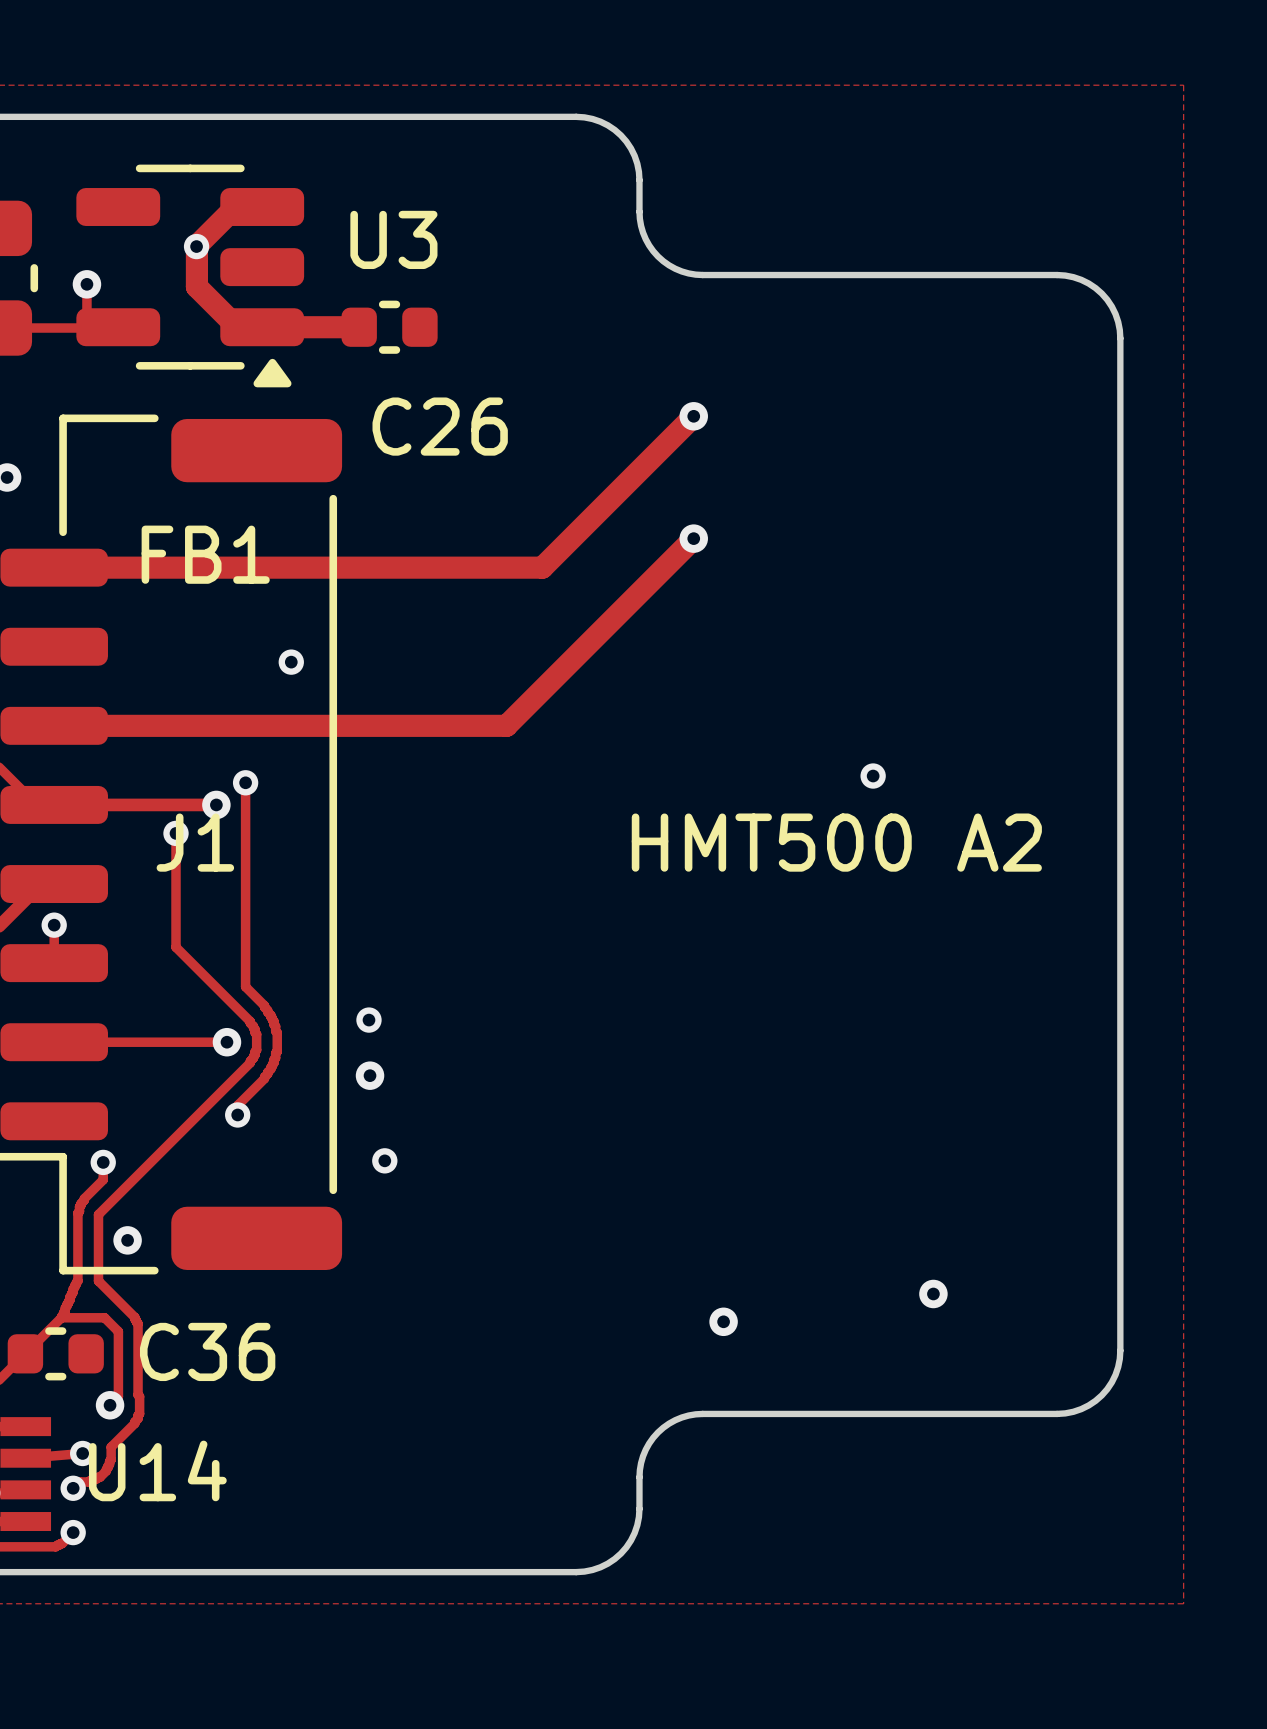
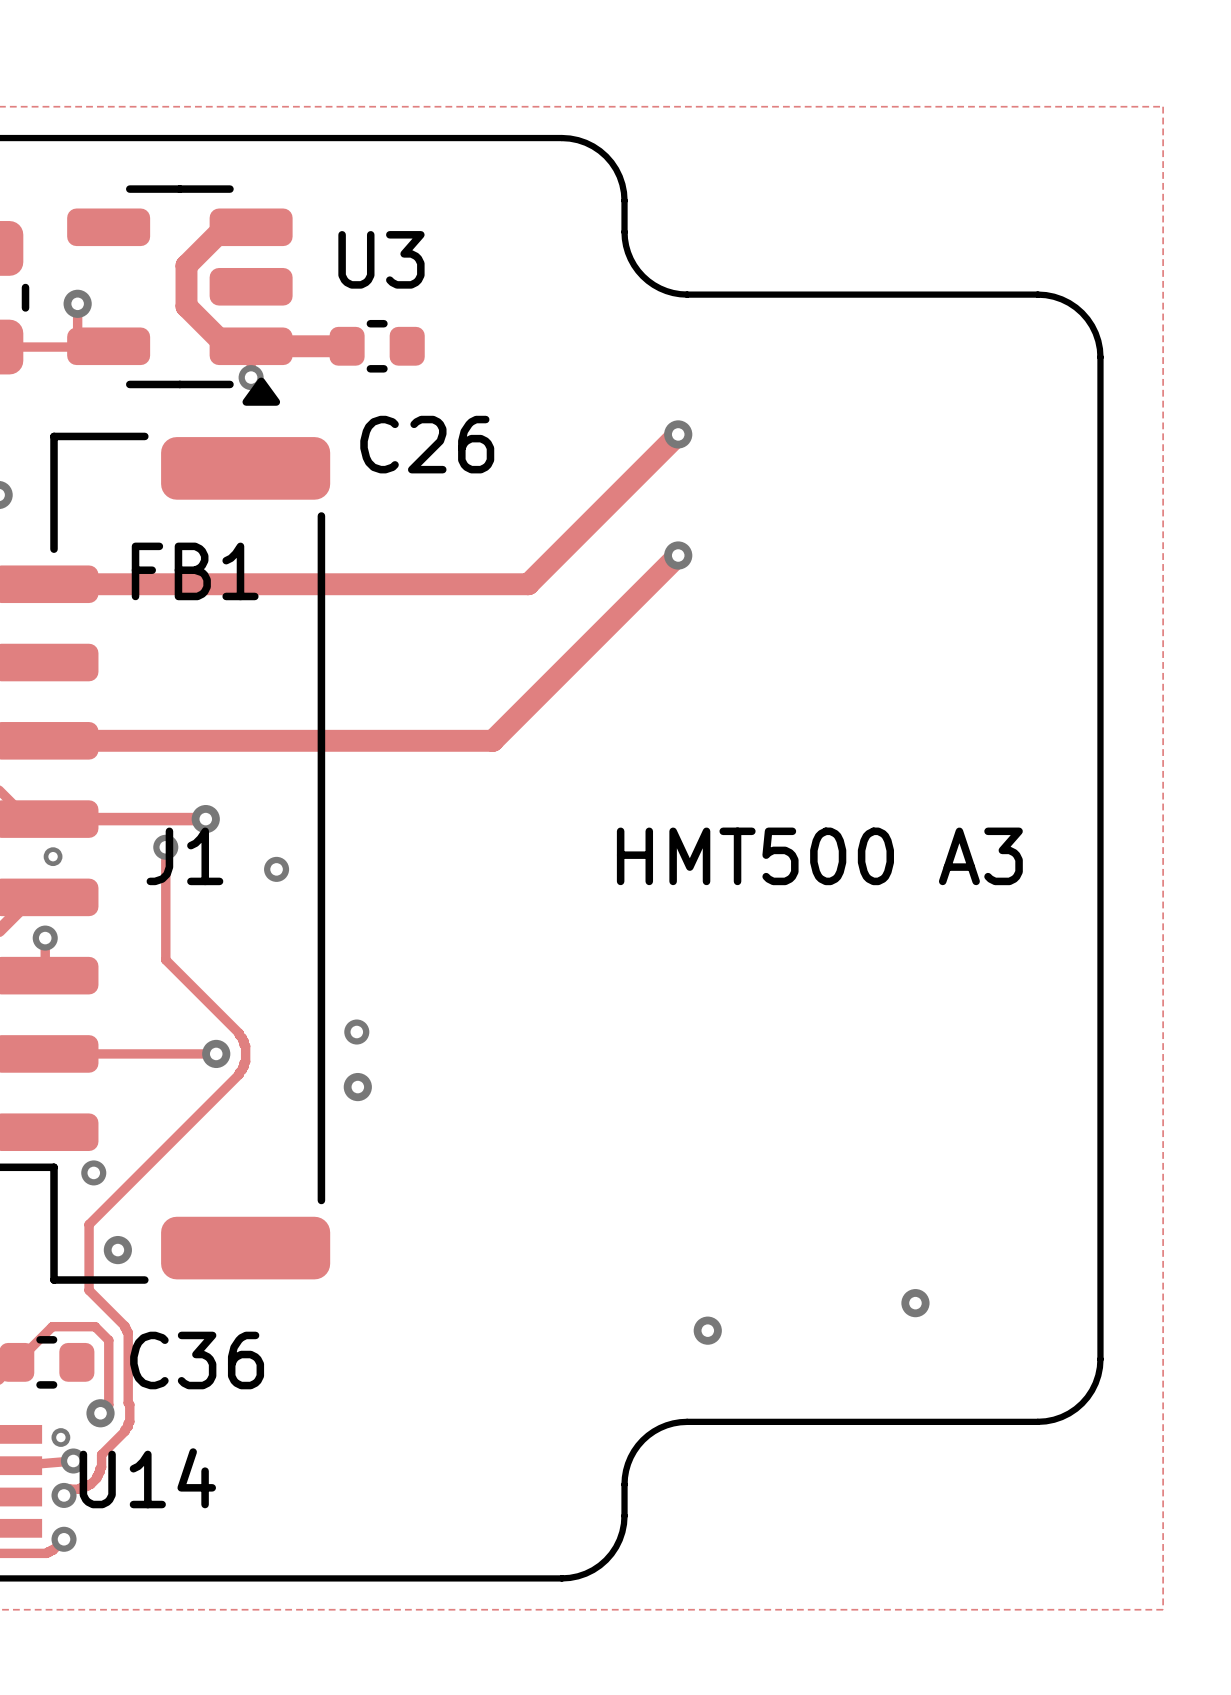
via position: (196, 246) -> (251, 377)
via: (291, 662) -> none
via: (873, 776) -> none
track: (245, 782) (245, 986) (264, 1005) (274, 1021) (277, 1032) (277, 1051) (274, 1062) (264, 1078) (237, 1105) (237, 1114) -> none
via position: (245, 782) -> (276, 869)
via: none -> (53, 856)
text: HMT500 A2 (836, 842) -> HMT500 A3 (819, 856)
via: (237, 1114) -> none
via: (384, 1160) -> none
track: (103, 1162) (103, 1179) (84, 1198) (79, 1206) (77, 1281) (62, 1317) -> none
via: none -> (60, 1437)

